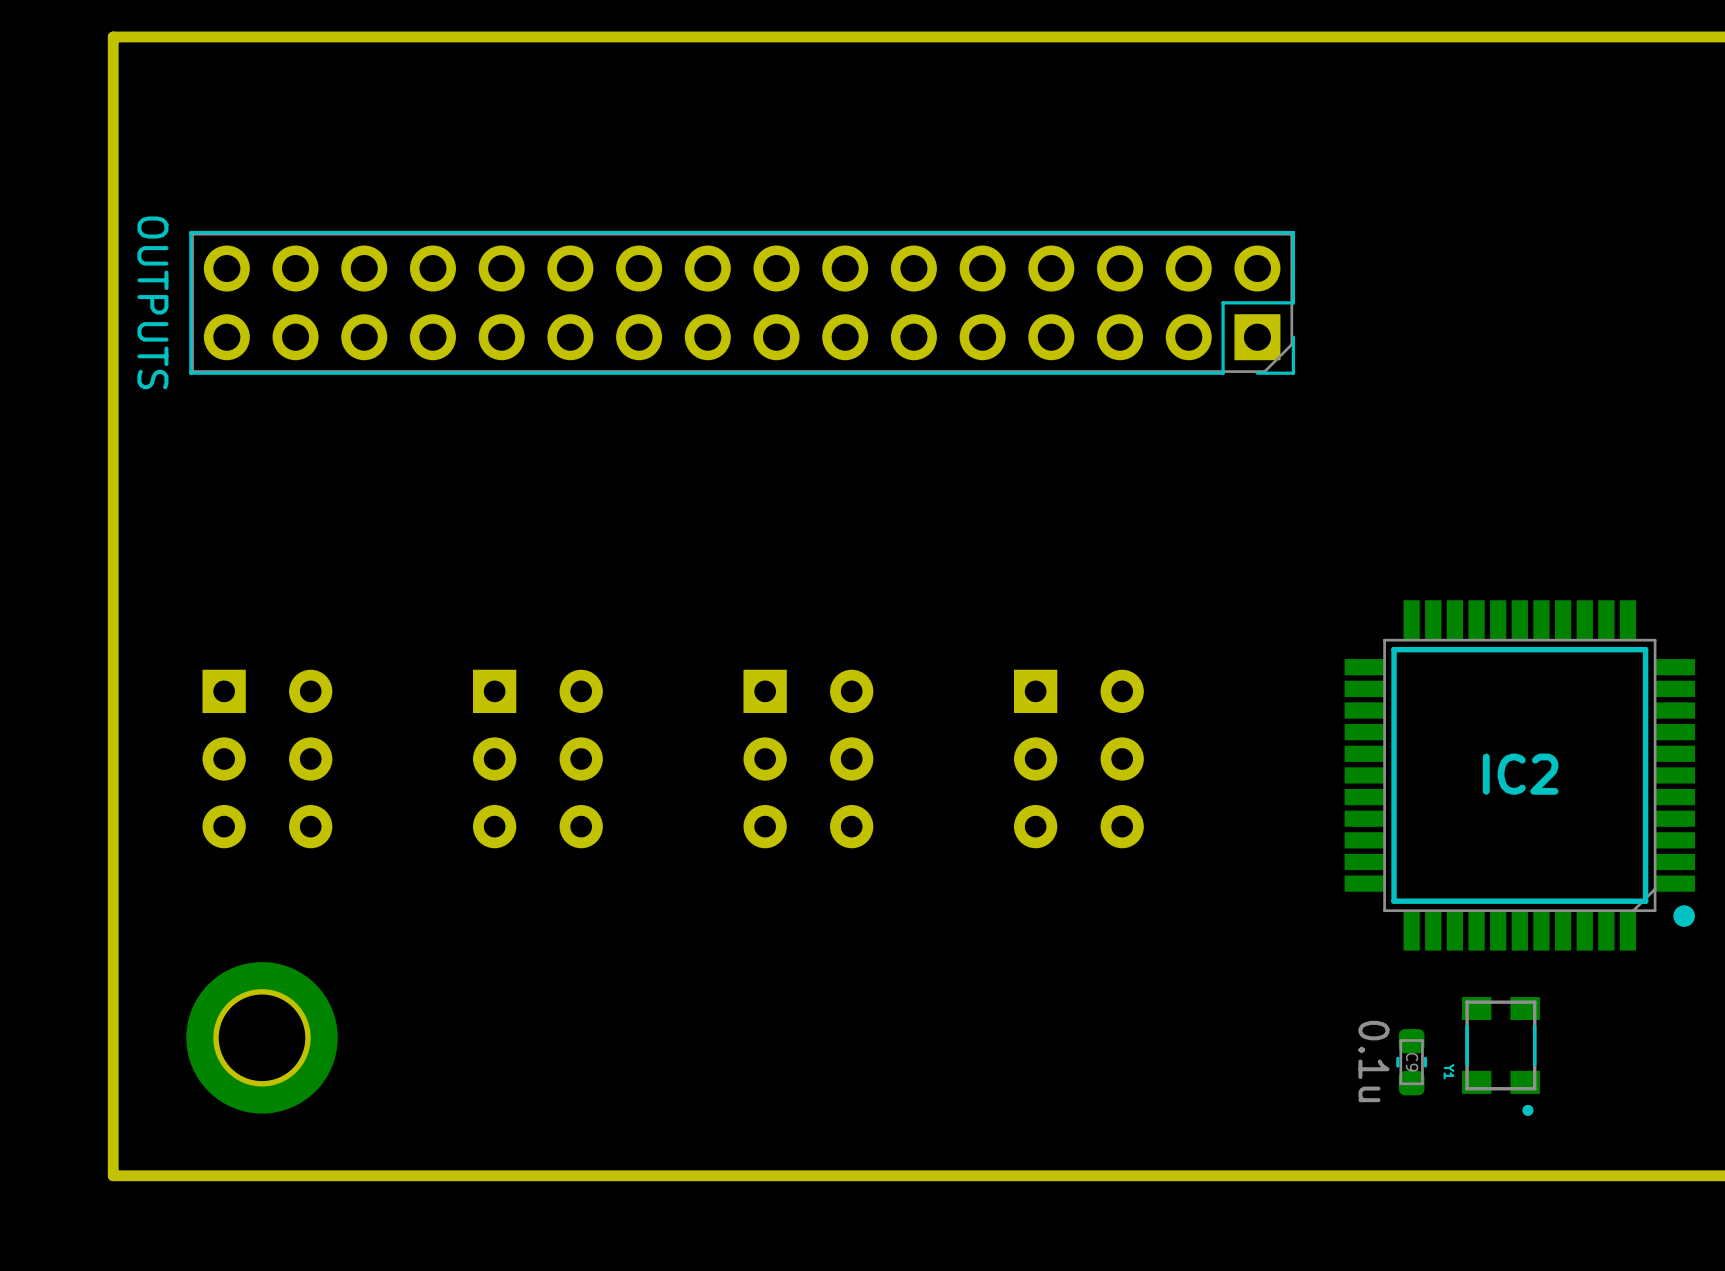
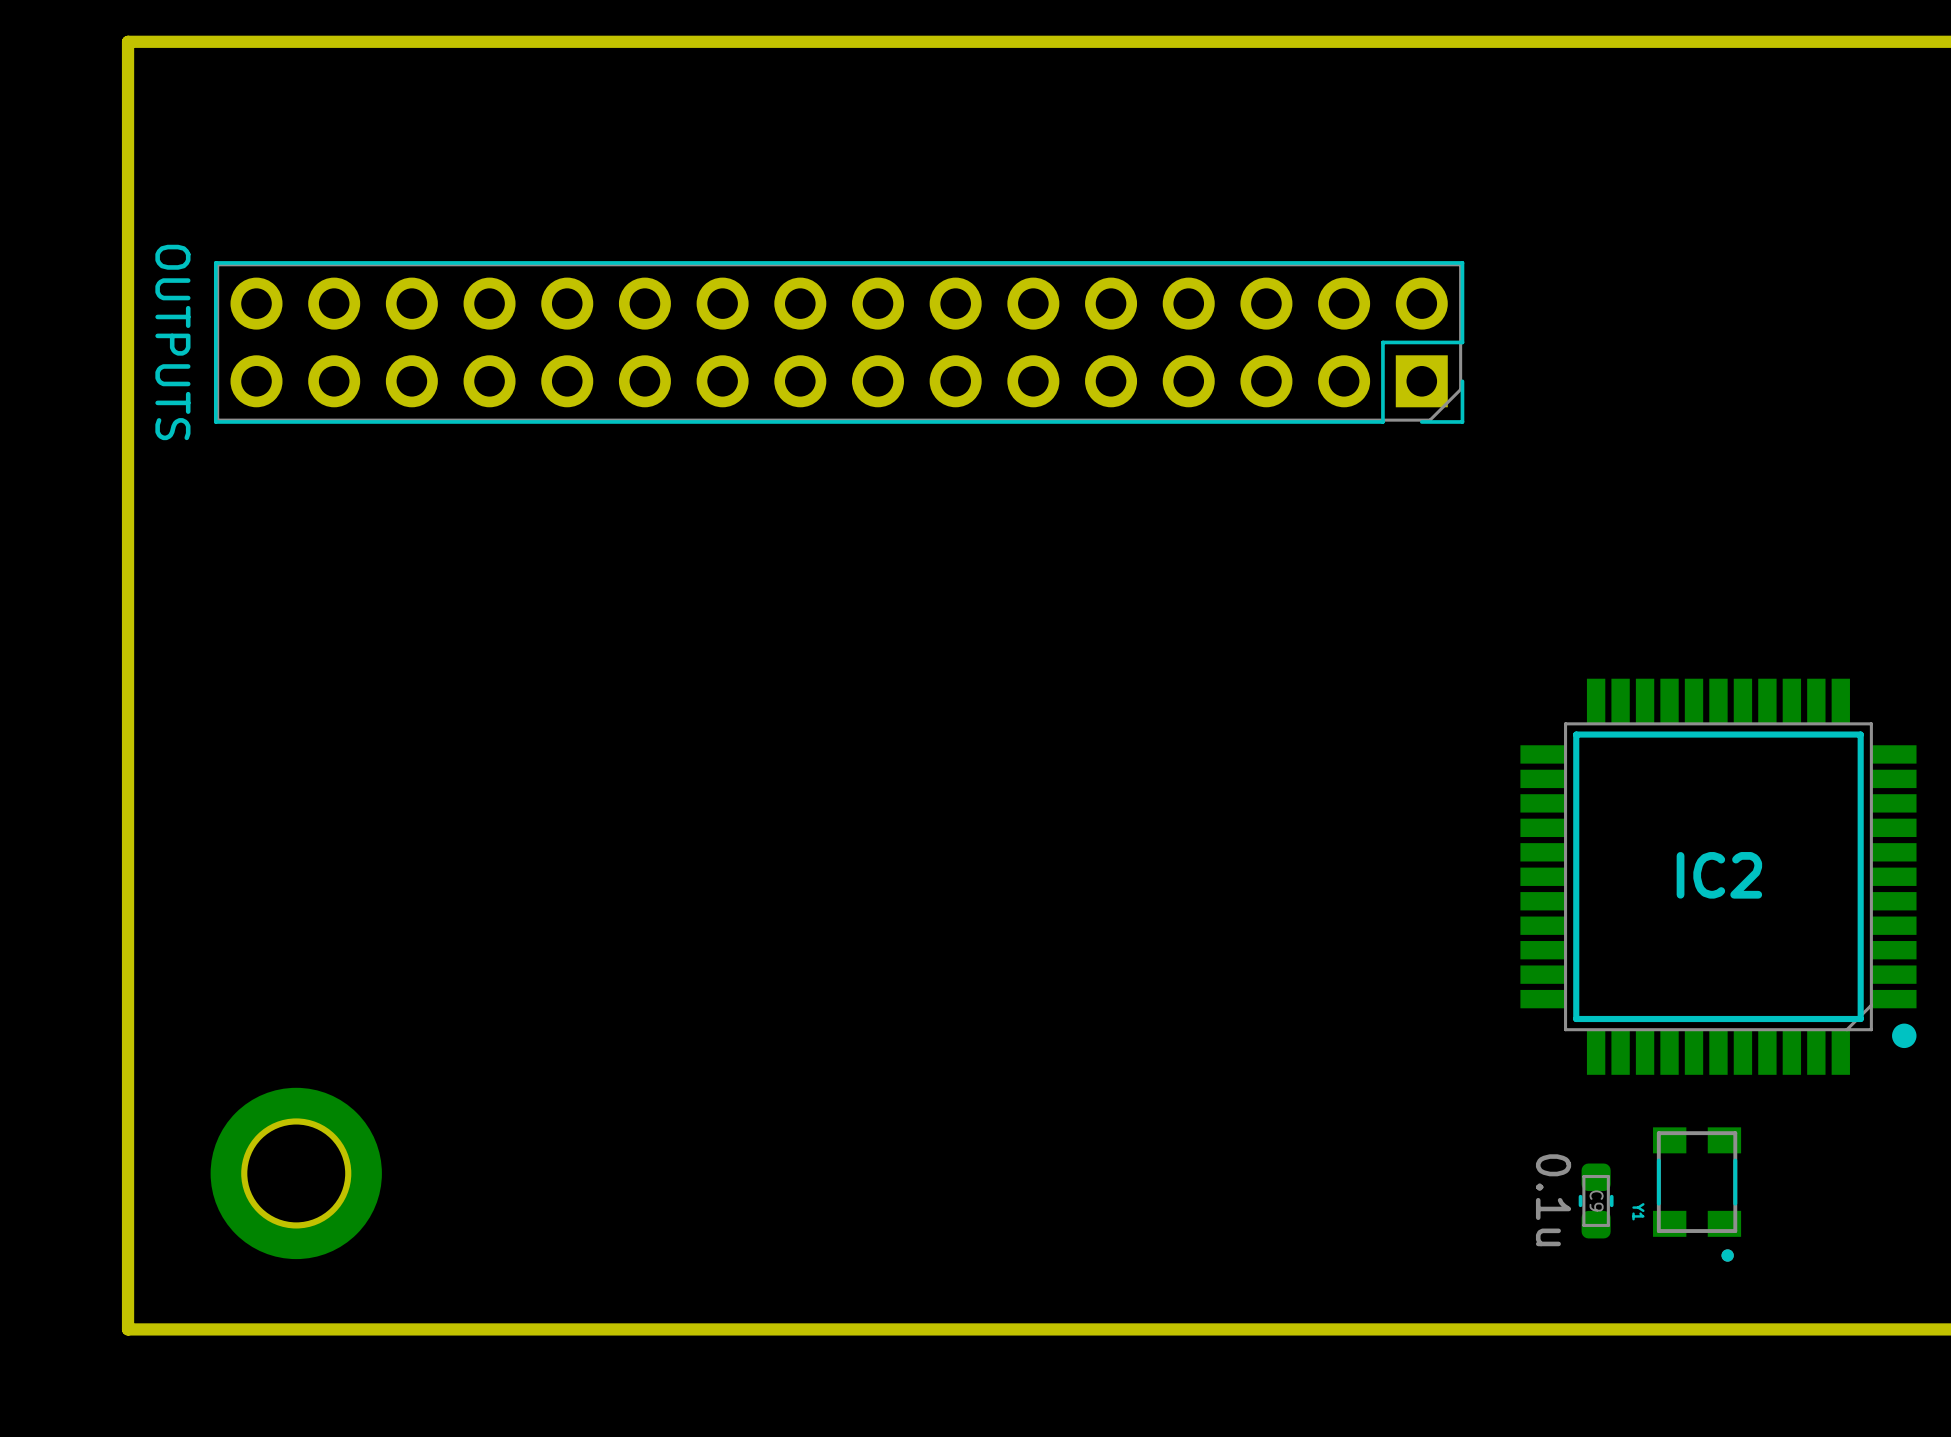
part: (267, 759) -> none
part: (537, 759) -> none
part: (808, 759) -> none
part: (1078, 759) -> none

